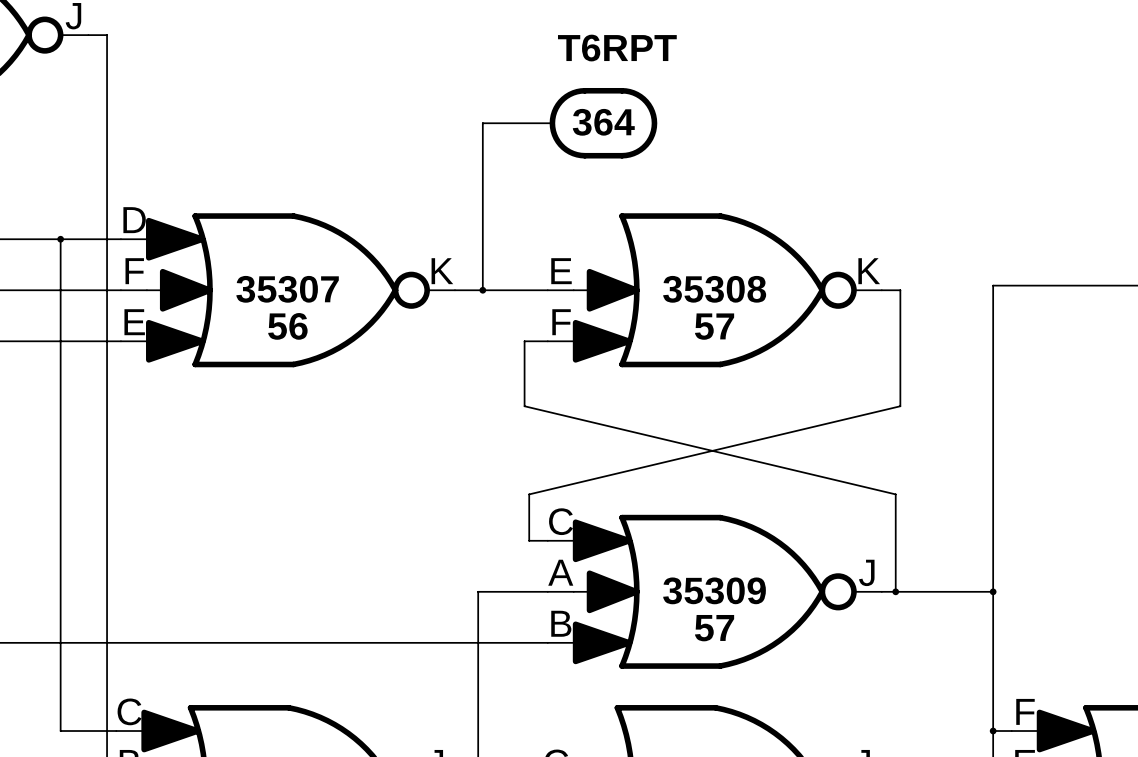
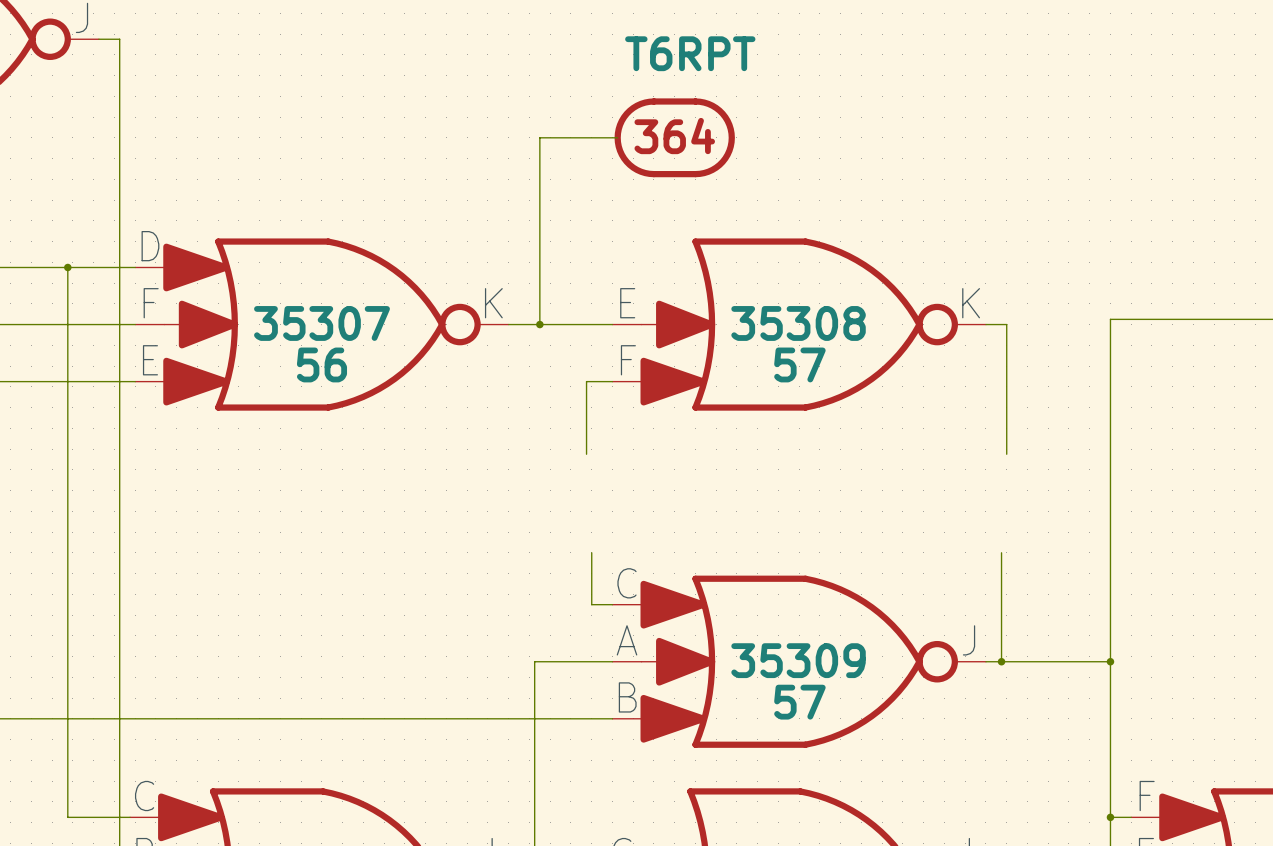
wire: (524, 406) (895, 494) -> none
wire: (900, 406) (529, 494) -> none

